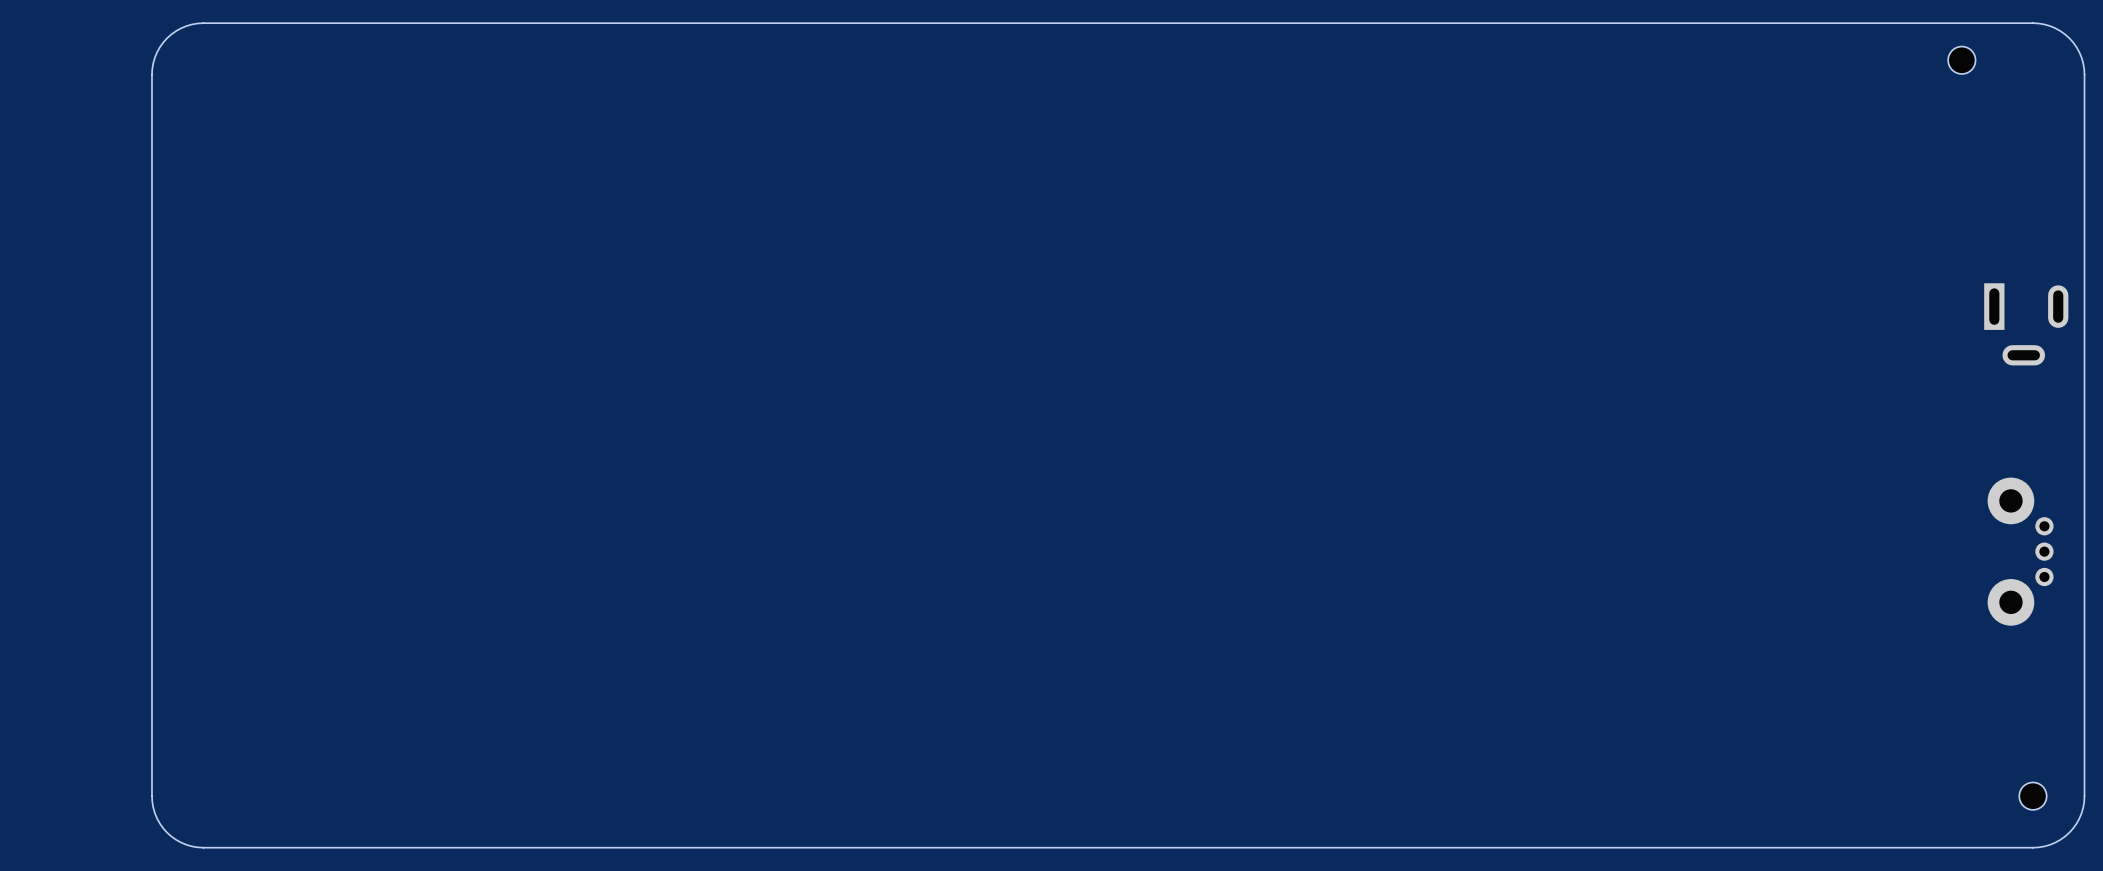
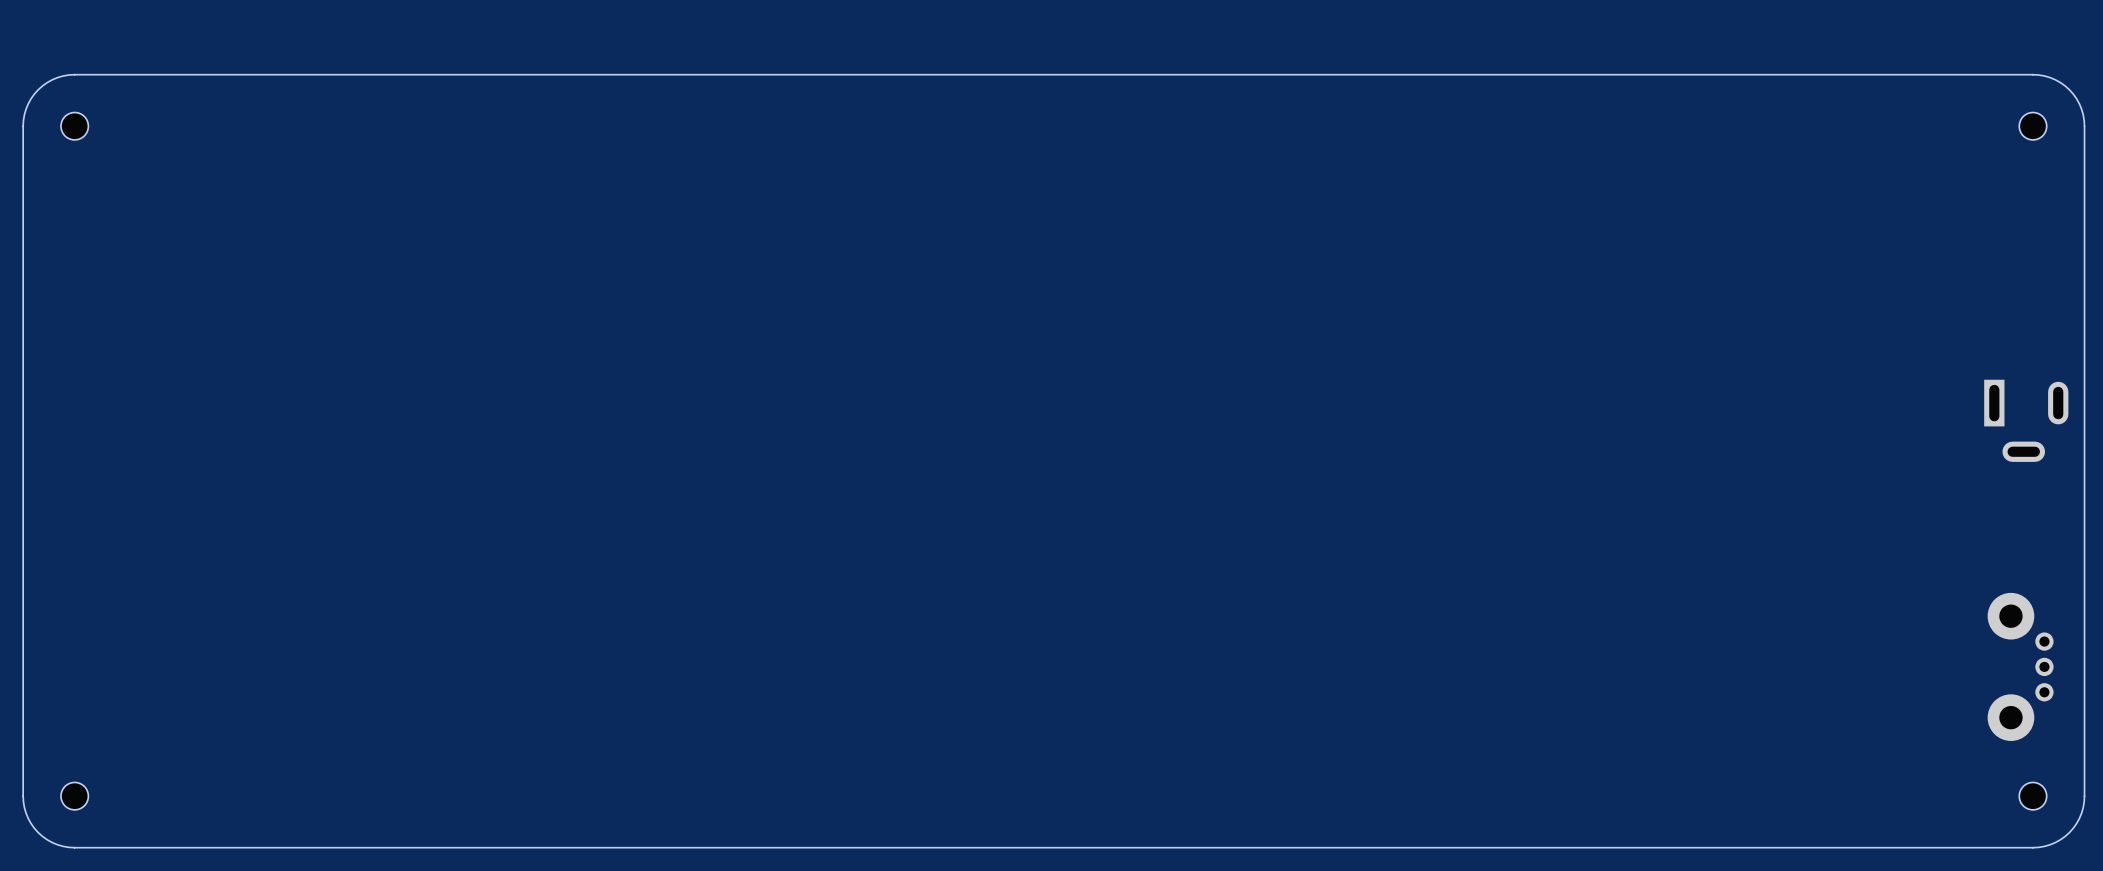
part position: (1961, 60) -> (2032, 126)
part: none -> (74, 126)
board edge: (2084, 126) (2084, 68) (2079, 52) (2069, 38) (2060, 31) (2044, 24) (2032, 23) (203, 23) (186, 26) (176, 31) (163, 42) (154, 57) (151, 74) (151, 796) (154, 813) (167, 832) (186, 844) (203, 847) -> (2084, 126) (2079, 103) (2069, 89) (2055, 79) (2032, 74) (74, 74) (57, 77) (42, 85) (31, 98) (24, 114) (23, 126) (24, 807) (28, 818) (38, 832) (47, 839) (63, 846) (203, 847)
part position: (2026, 324) -> (2026, 420)
part position: (2020, 551) -> (2020, 666)
part: none -> (74, 796)

